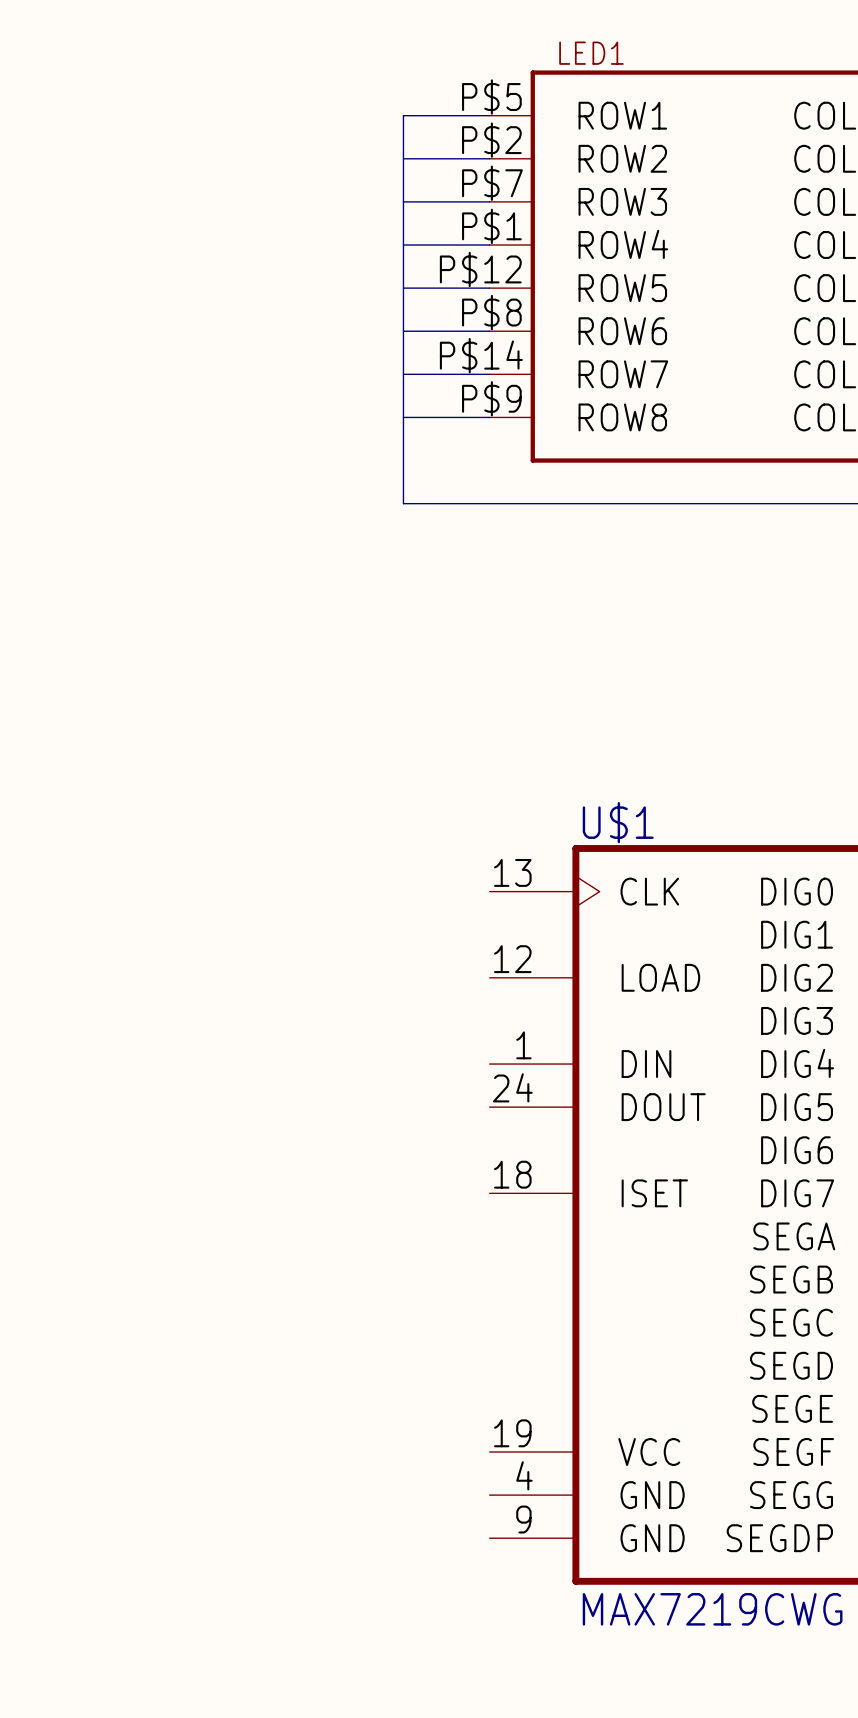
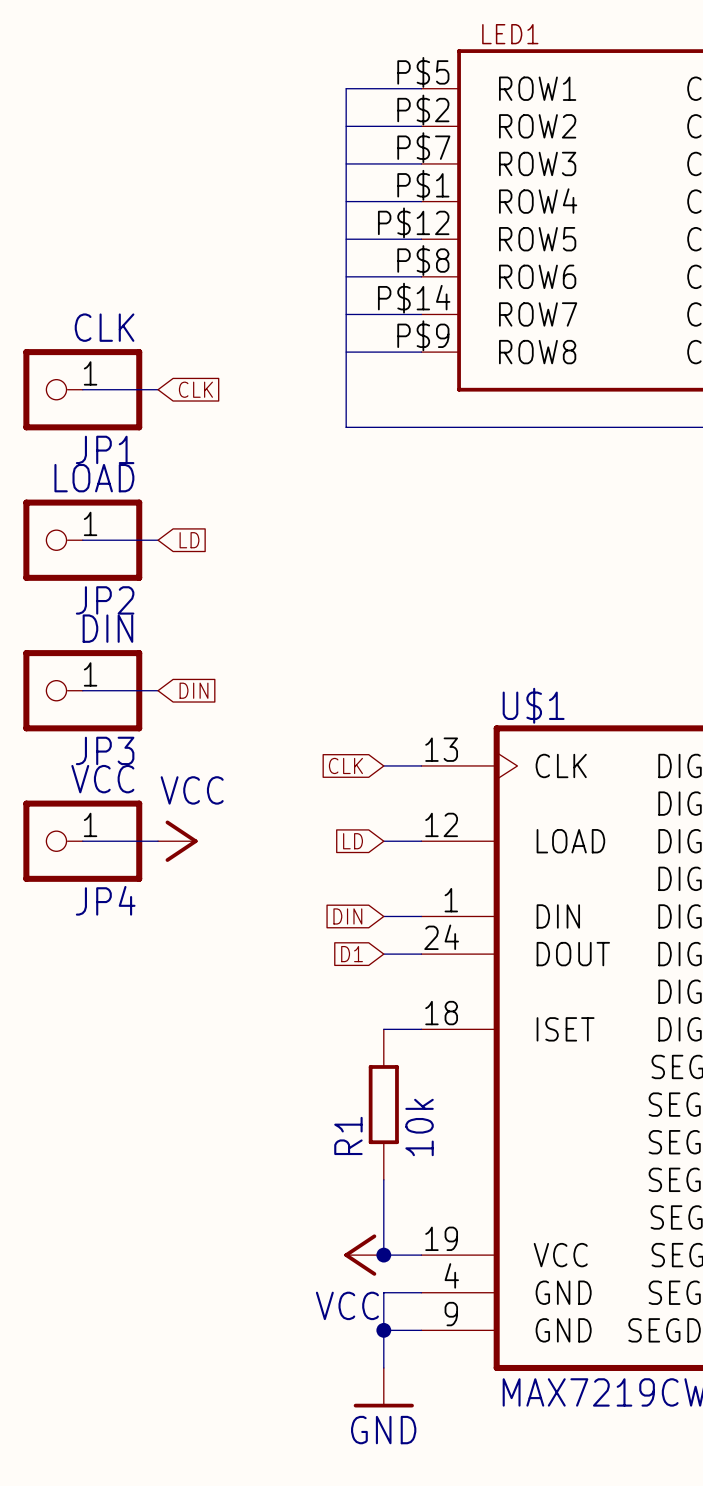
wire: none -> (82, 389) (158, 389)
JP1: none -> CLK (82, 389)
global label: none -> CLK (195, 389)
wire: none -> (82, 540) (158, 540)
JP2: none -> LOAD (82, 540)
global label: none -> LD (189, 540)
wire: none -> (82, 690) (158, 690)
JP3: none -> DIN (82, 690)
global label: none -> DIN (193, 690)
global label: none -> CLK (345, 765)
wire: none -> (383, 765) (421, 765)
wire: none -> (82, 841) (158, 841)
JP4: none -> VCC (82, 841)
power symbol: none -> VCC (177, 841)
global label: none -> LD (353, 841)
wire: none -> (383, 841) (421, 841)
global label: none -> DIN (347, 916)
wire: none -> (383, 916) (421, 916)
global label: none -> D1 (352, 954)
wire: none -> (383, 954) (421, 954)
wire: none -> (383, 1029) (421, 1029)
R1: none -> 10k (383, 1104)
wire: none -> (383, 1179) (383, 1255) (421, 1255)
power symbol: none -> VCC (364, 1255)
junction: none -> (383, 1255)
wire: none -> (421, 1292) (383, 1292) (383, 1367)
wire: none -> (383, 1330) (421, 1330)
junction: none -> (383, 1330)
power symbol: none -> GND (383, 1387)

